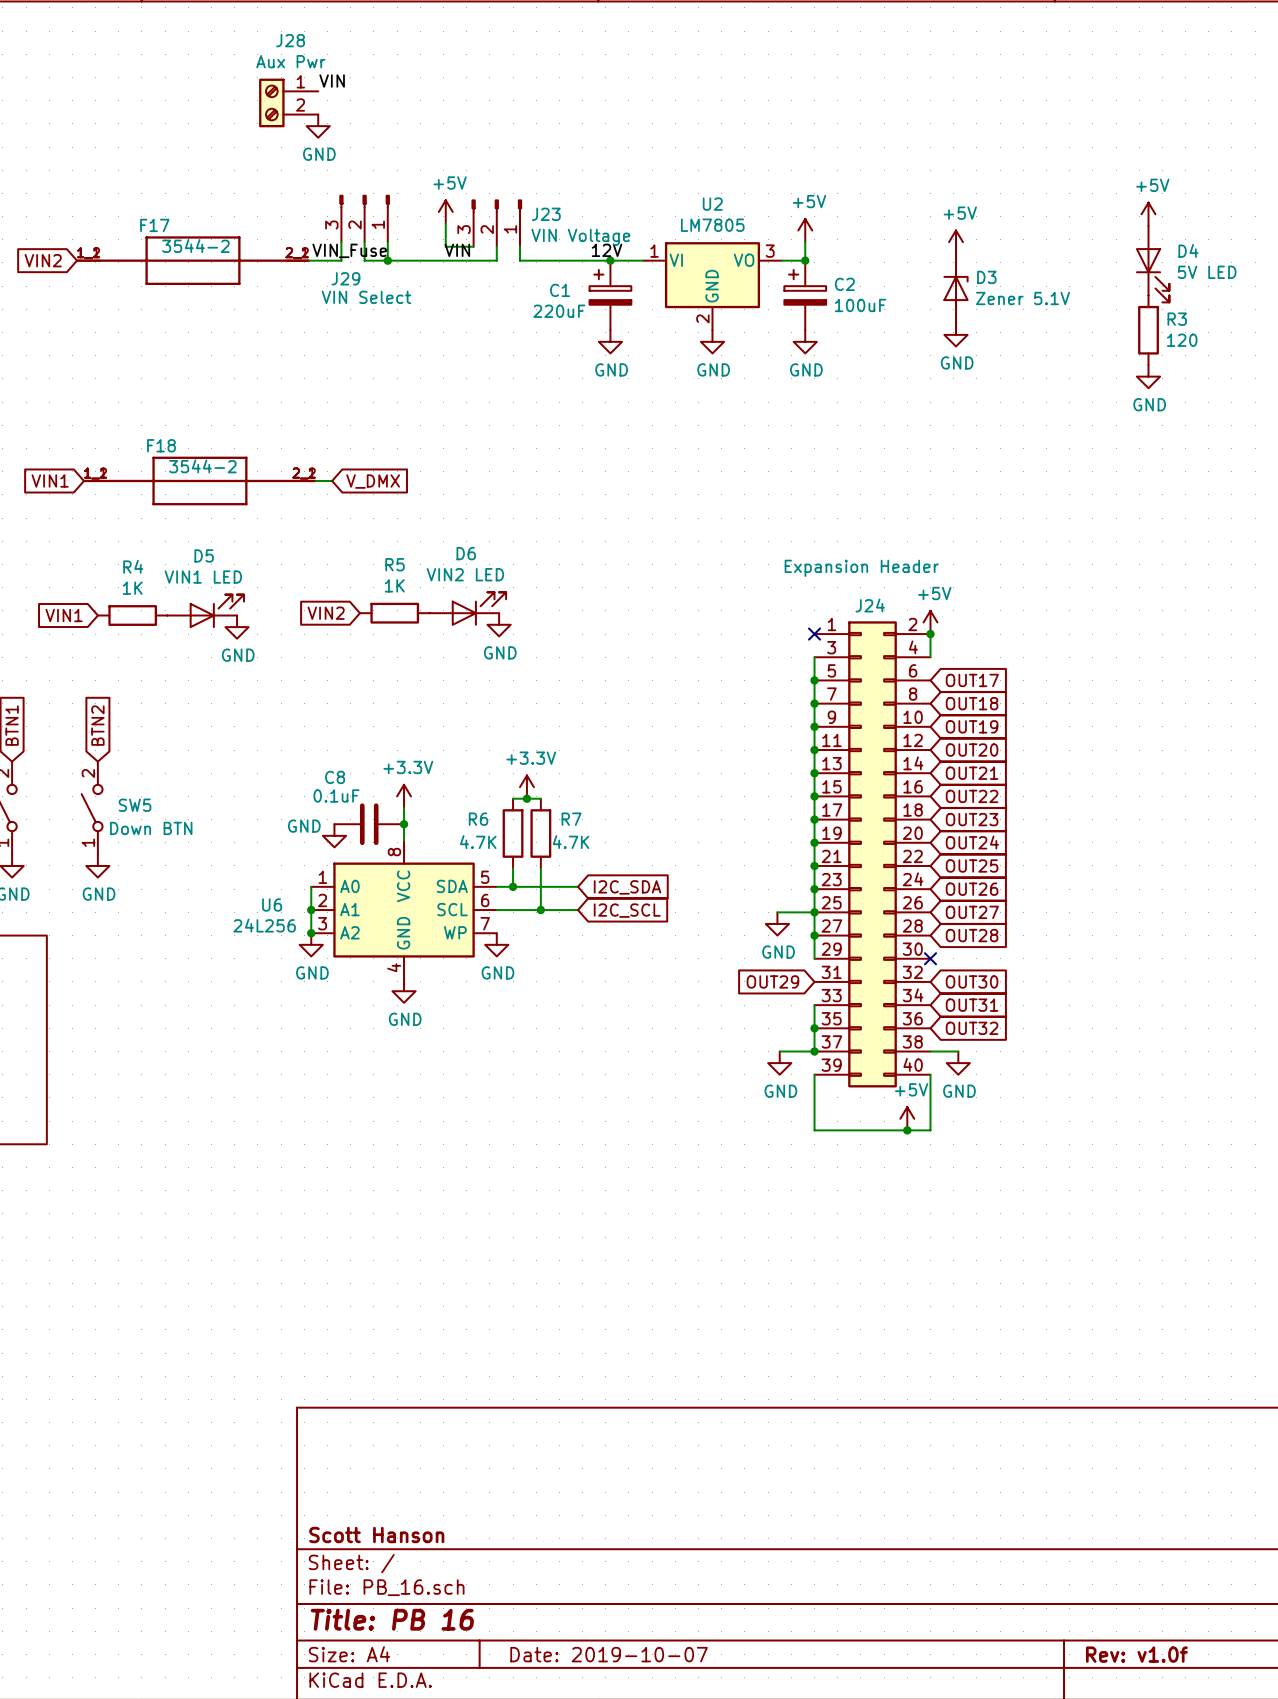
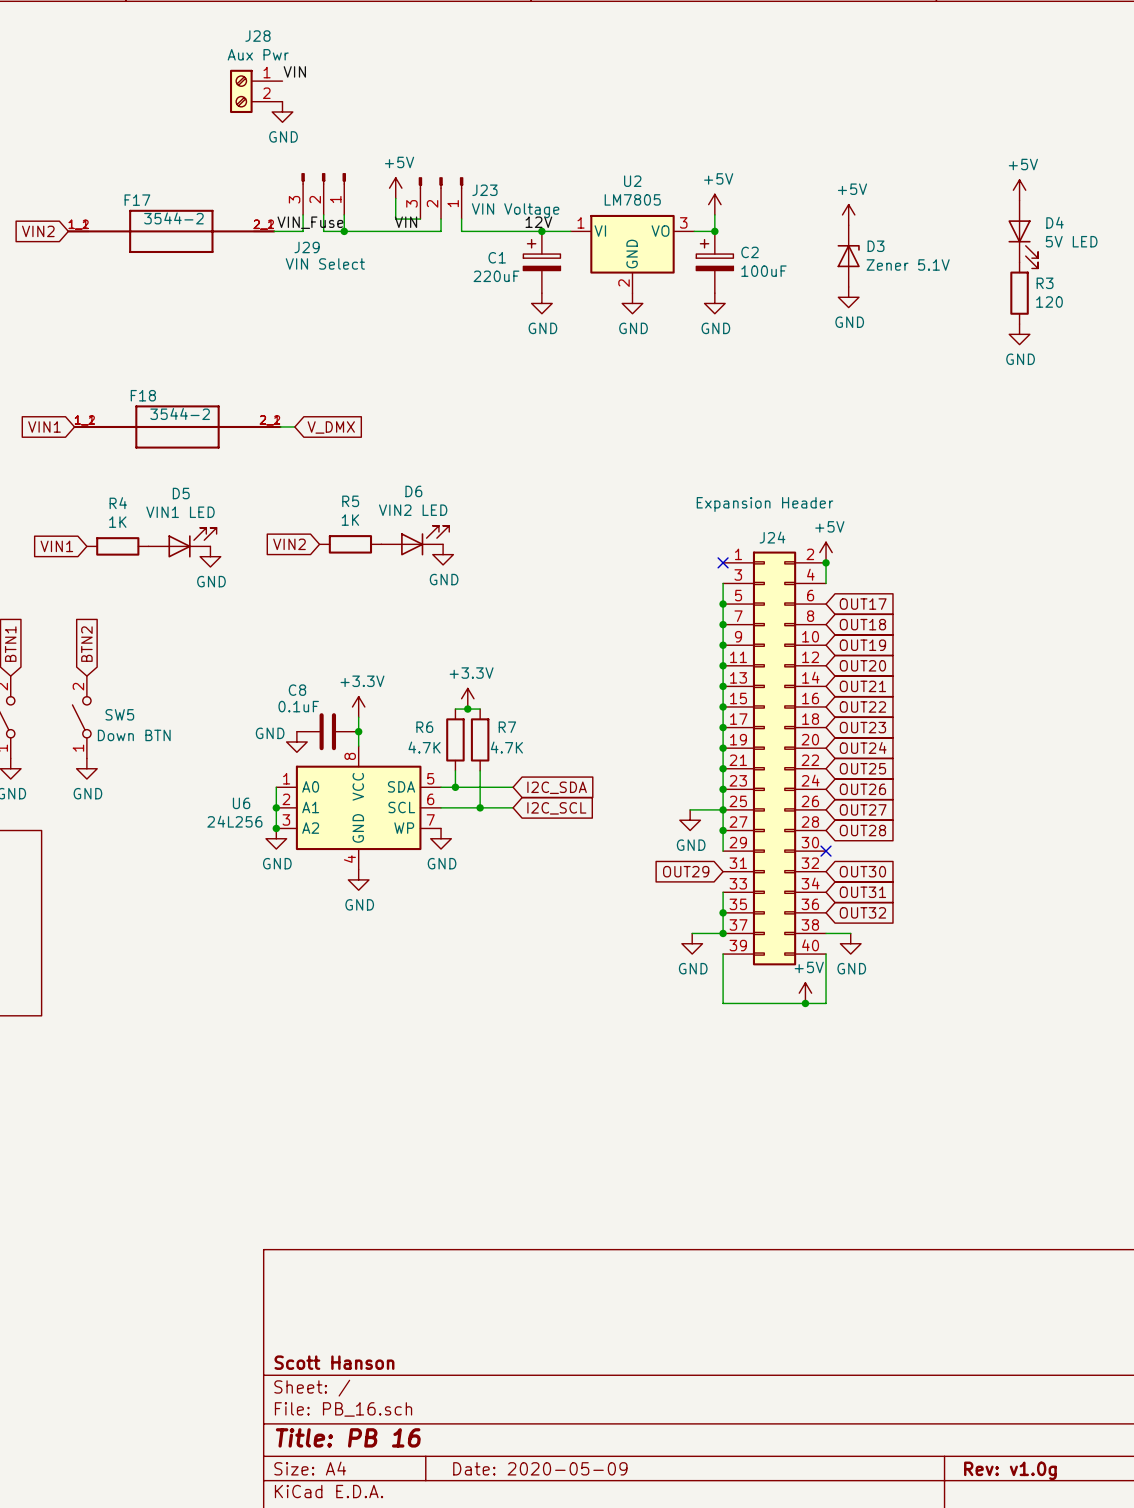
title block: Date: 2019-10-07 (609, 1654) -> Date: 2020-05-09 (540, 1468)
title block: Rev: v1.0f (1136, 1654) -> Rev: v1.0g (1010, 1470)

